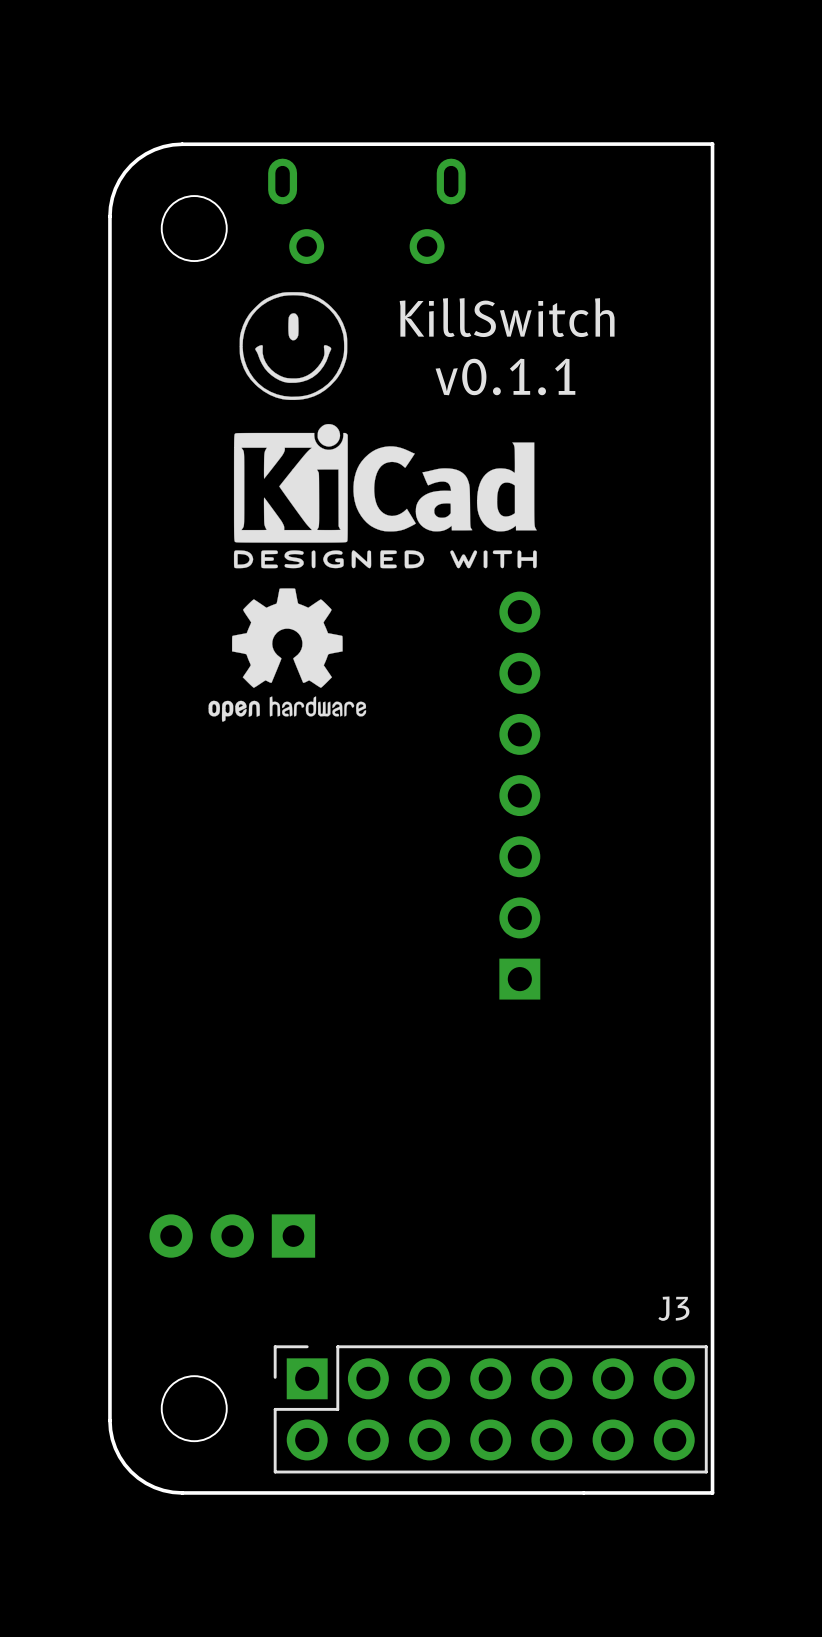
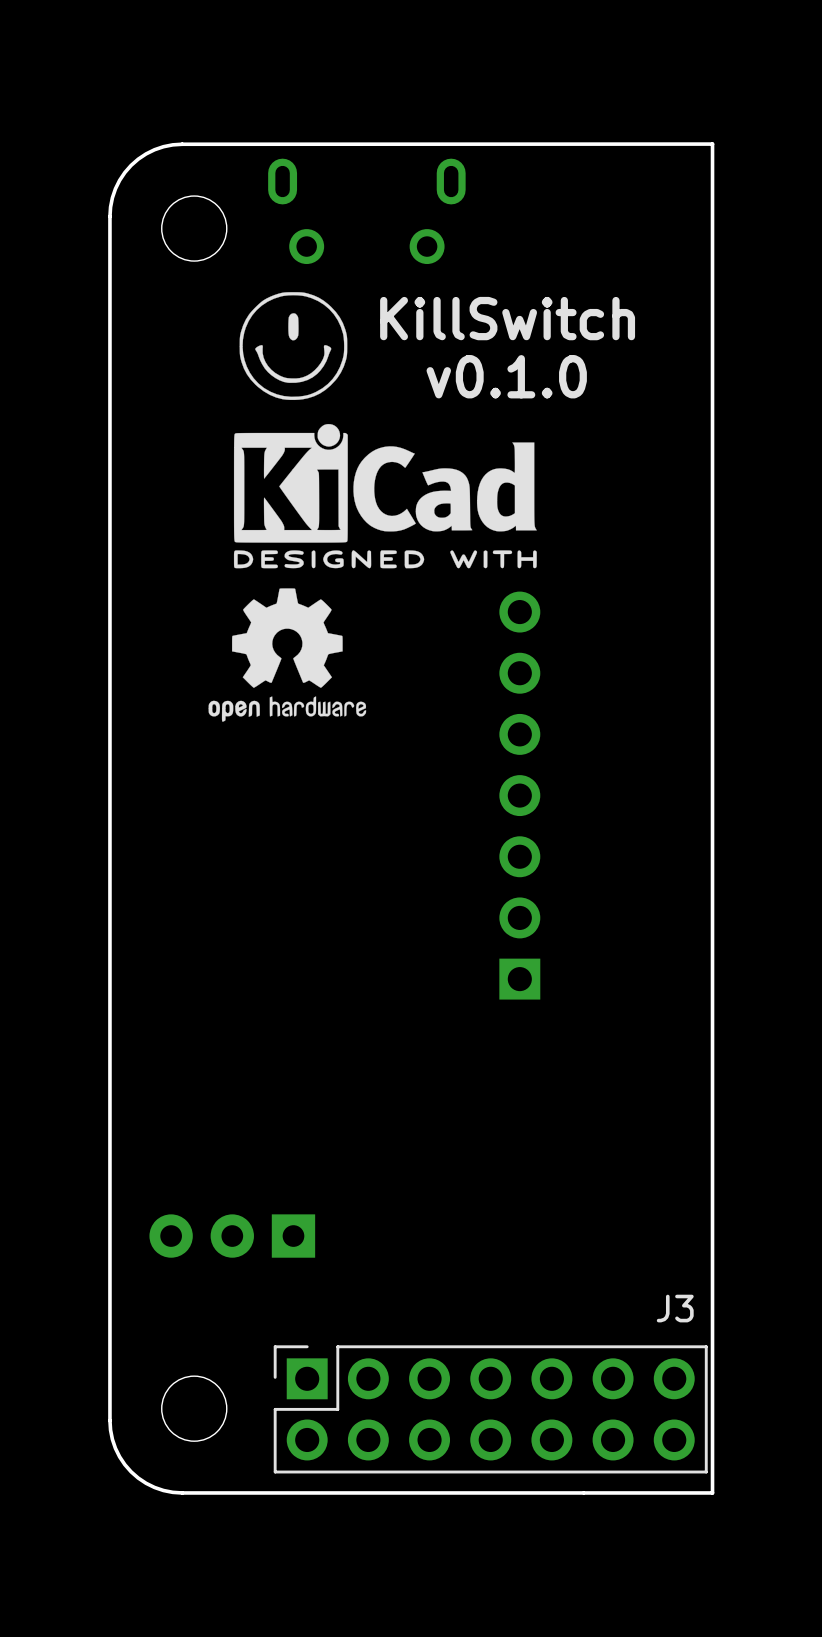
text: v0.1.1 (505, 376) -> v0.1.0 (506, 376)

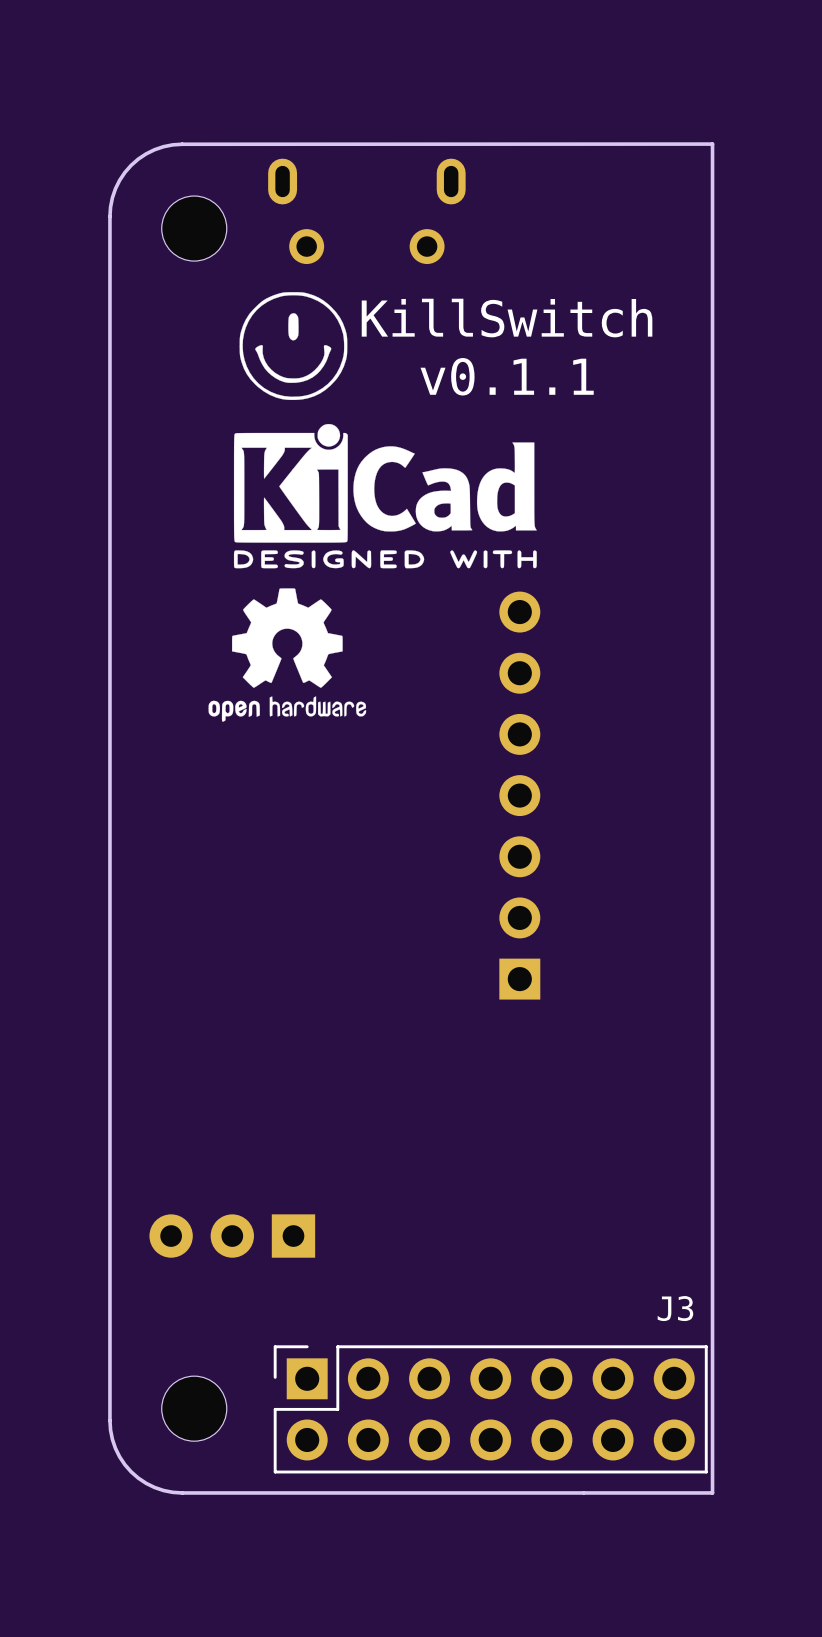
text: v0.1.0 (506, 376) -> v0.1.1 (507, 376)

